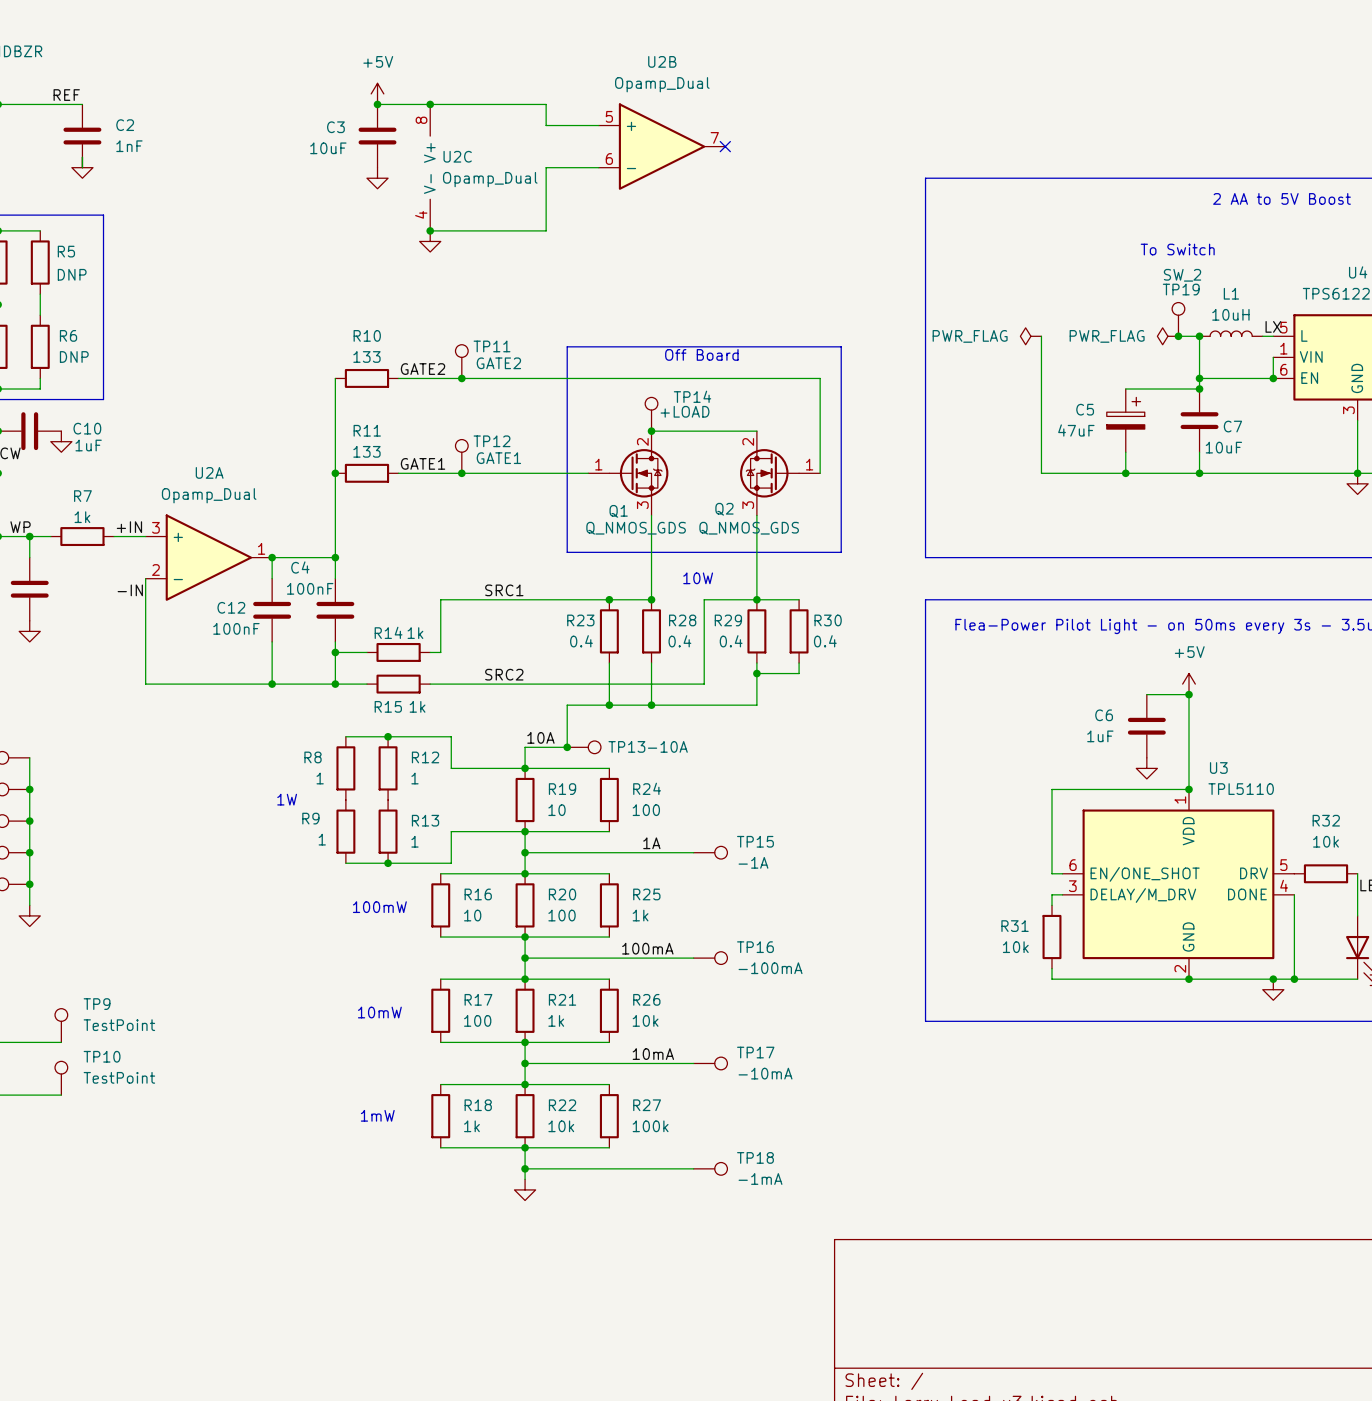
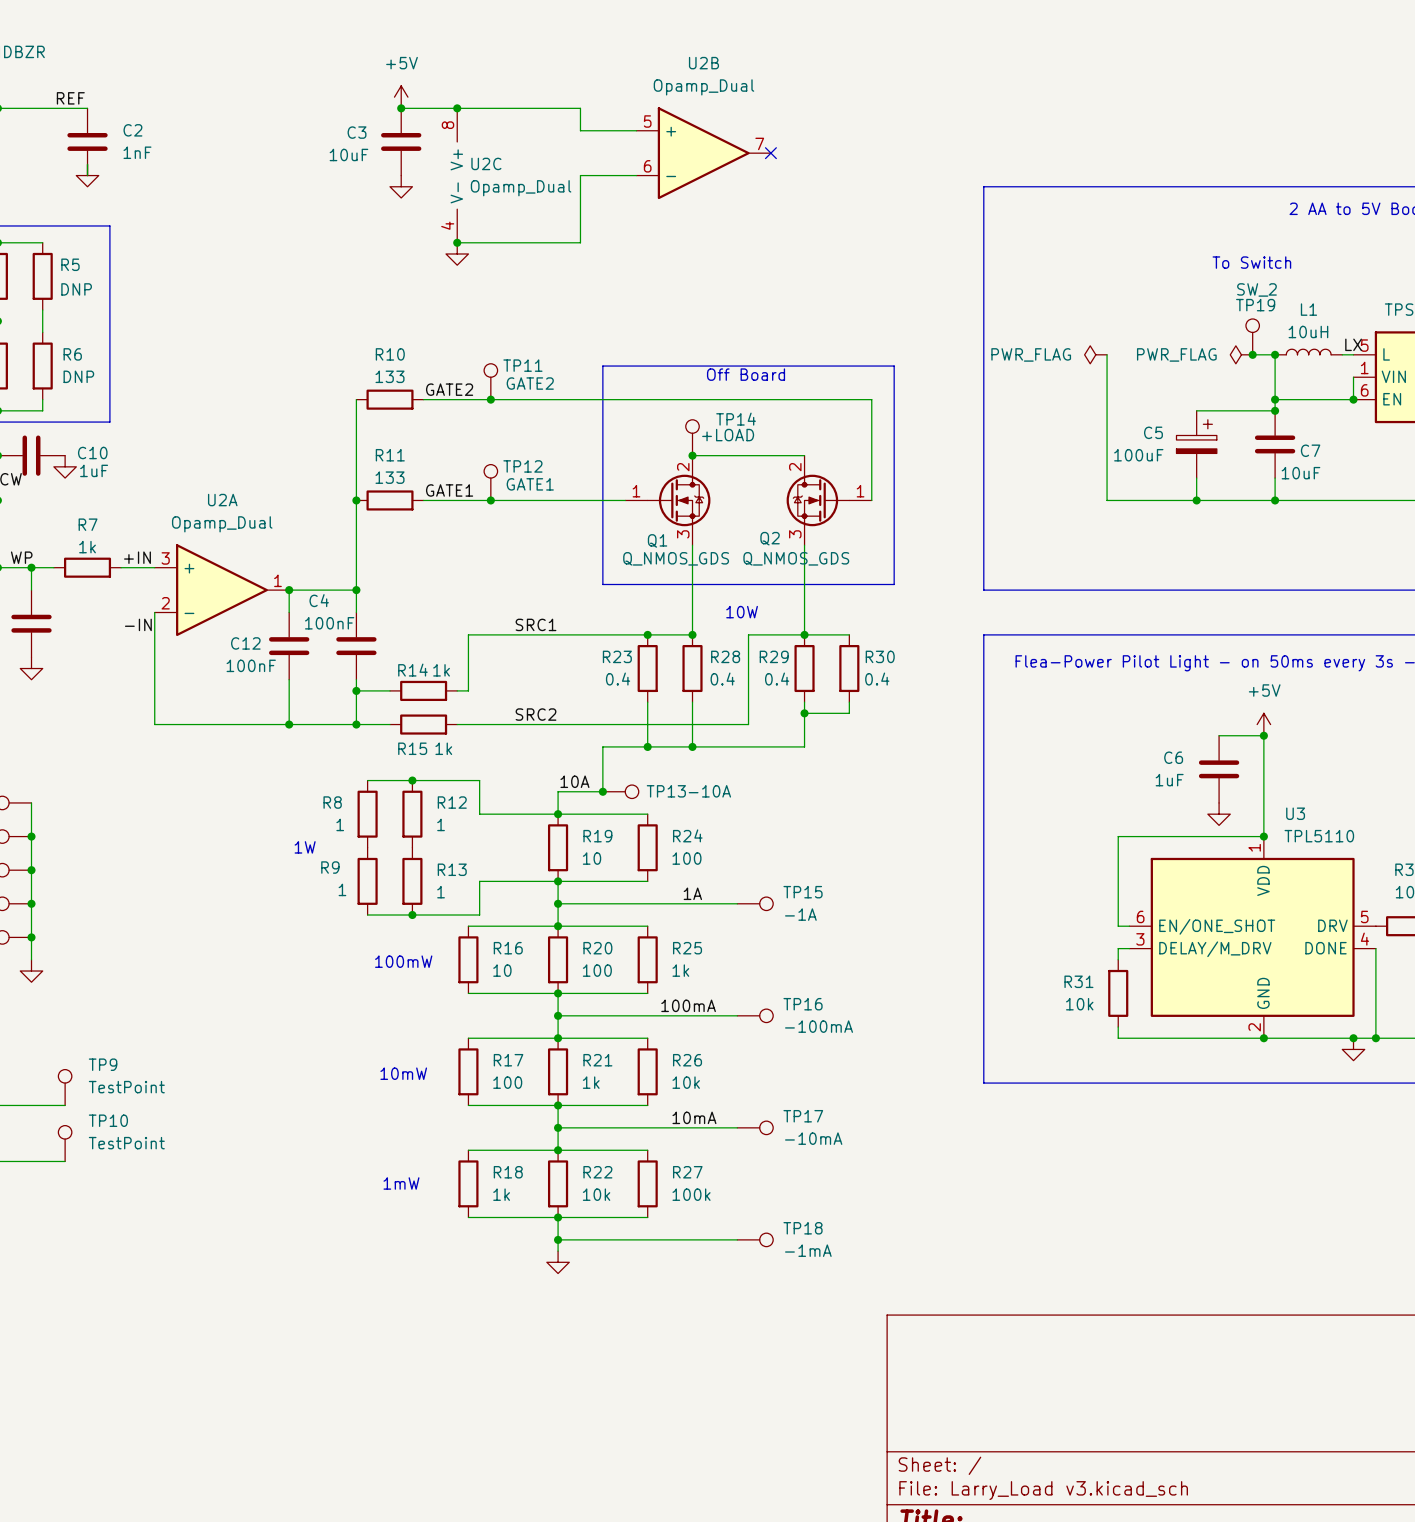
C5 value: 47uF (1076, 430) -> 100uF (1138, 455)

